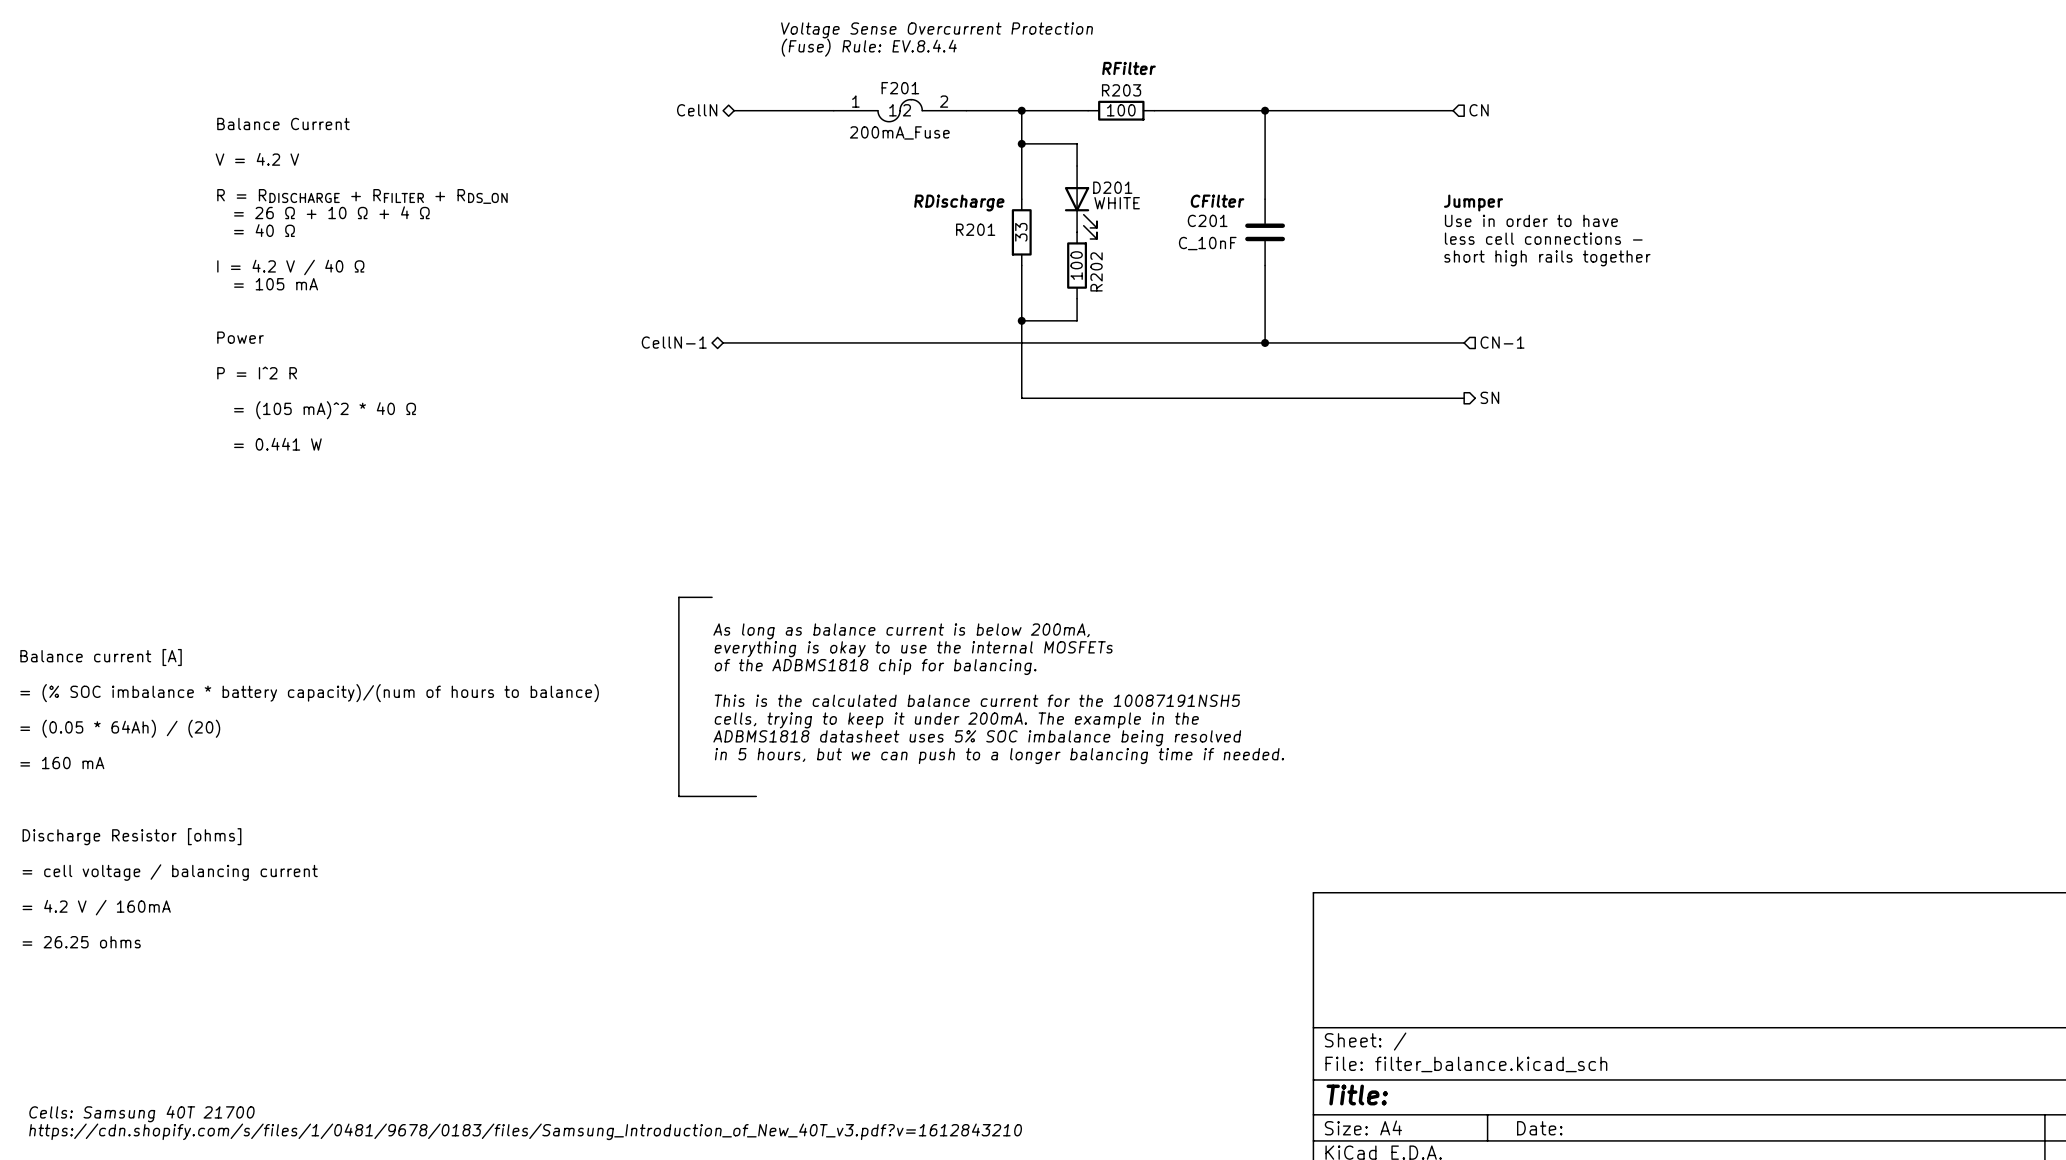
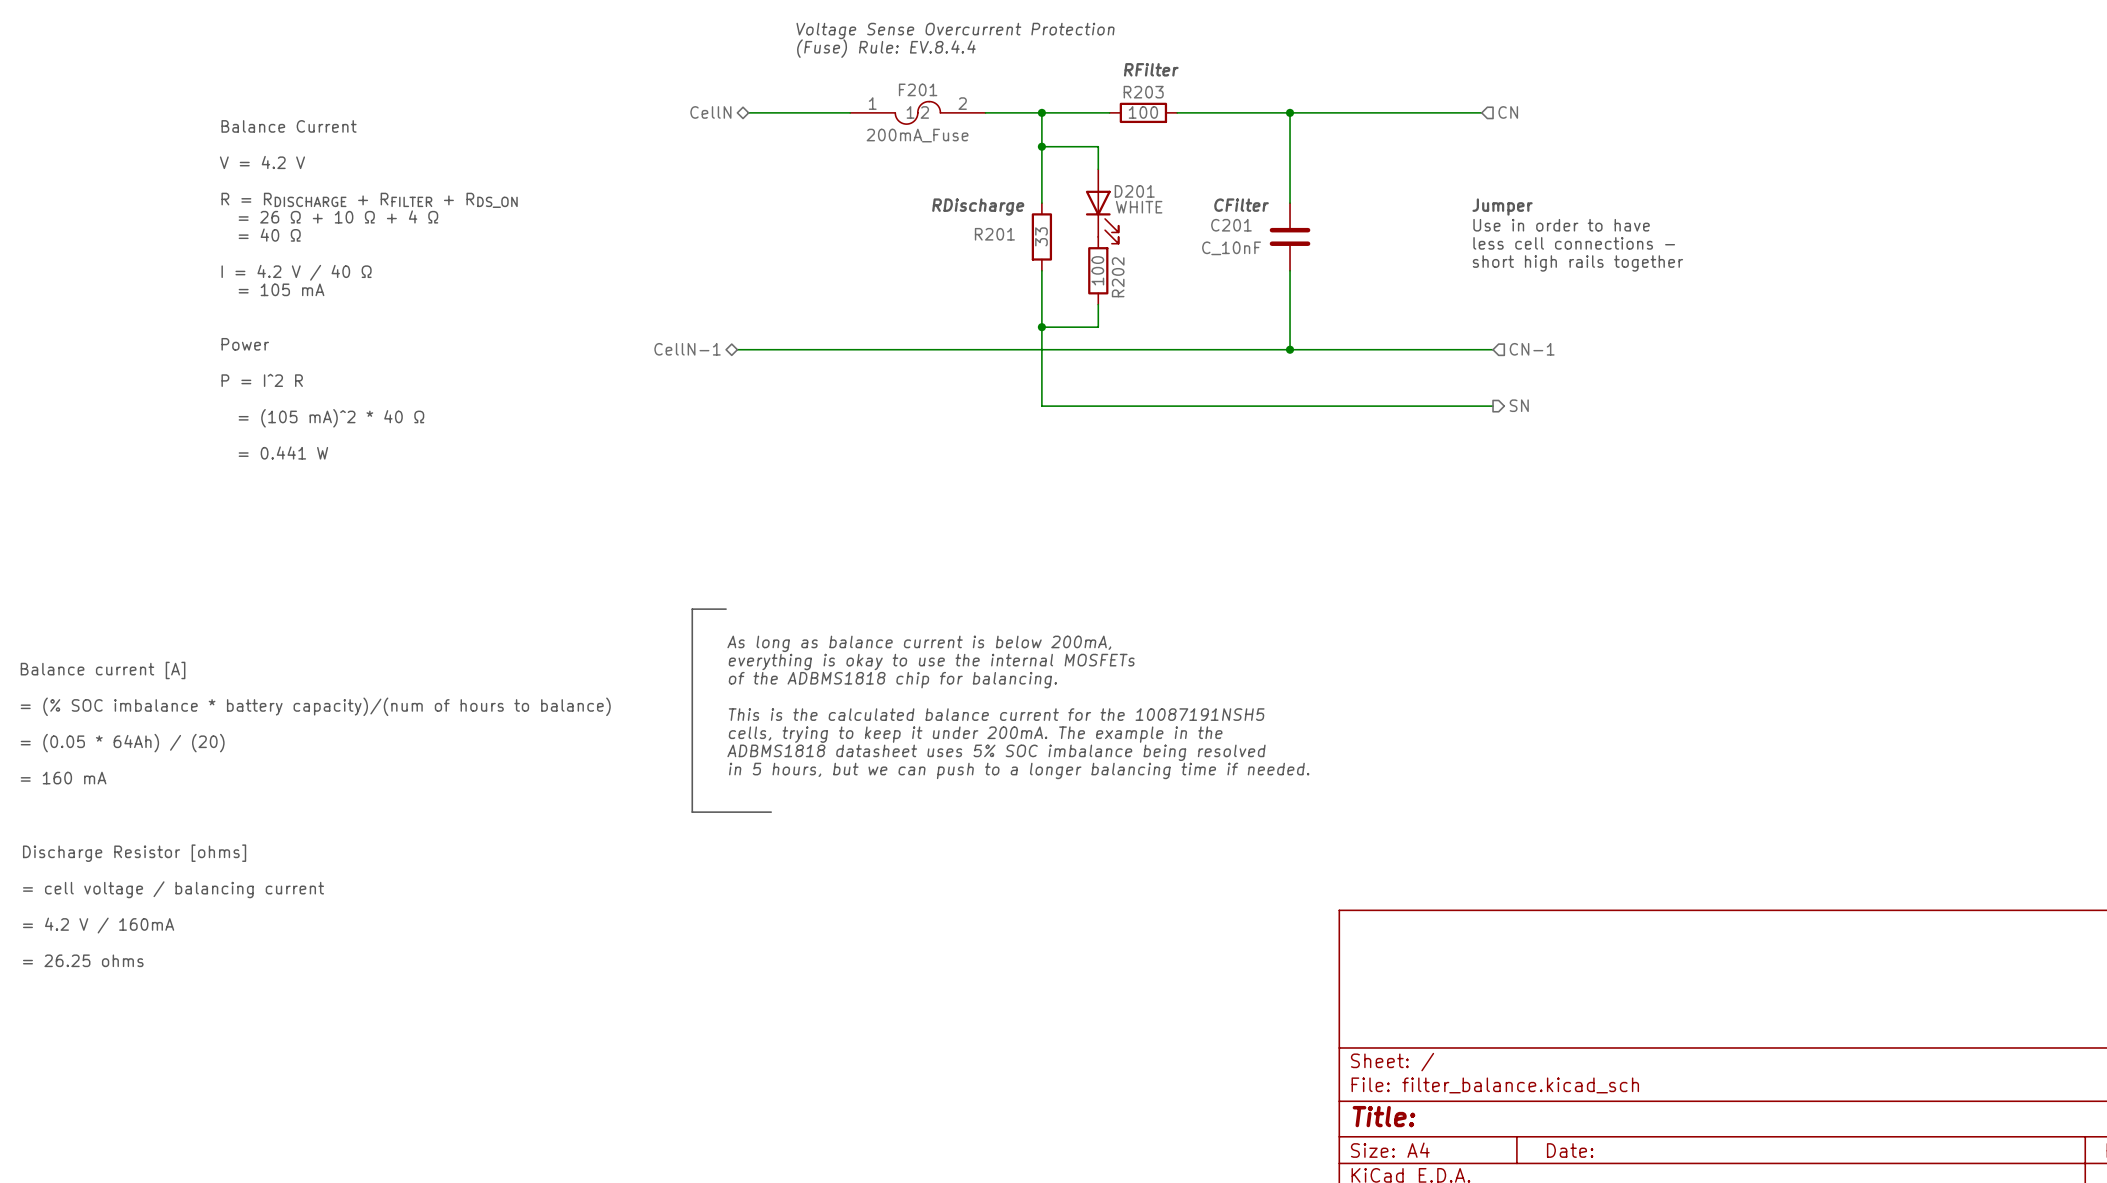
text: Cells: Samsung 40T 21700 (141, 1114) -> none
text: https://cdn.shopify.com/s/files/1/0481/9678/0183/files/Samsung_Introduction_of_New_40T_v3.pdf?v=1612843210 (525, 1131) -> none

